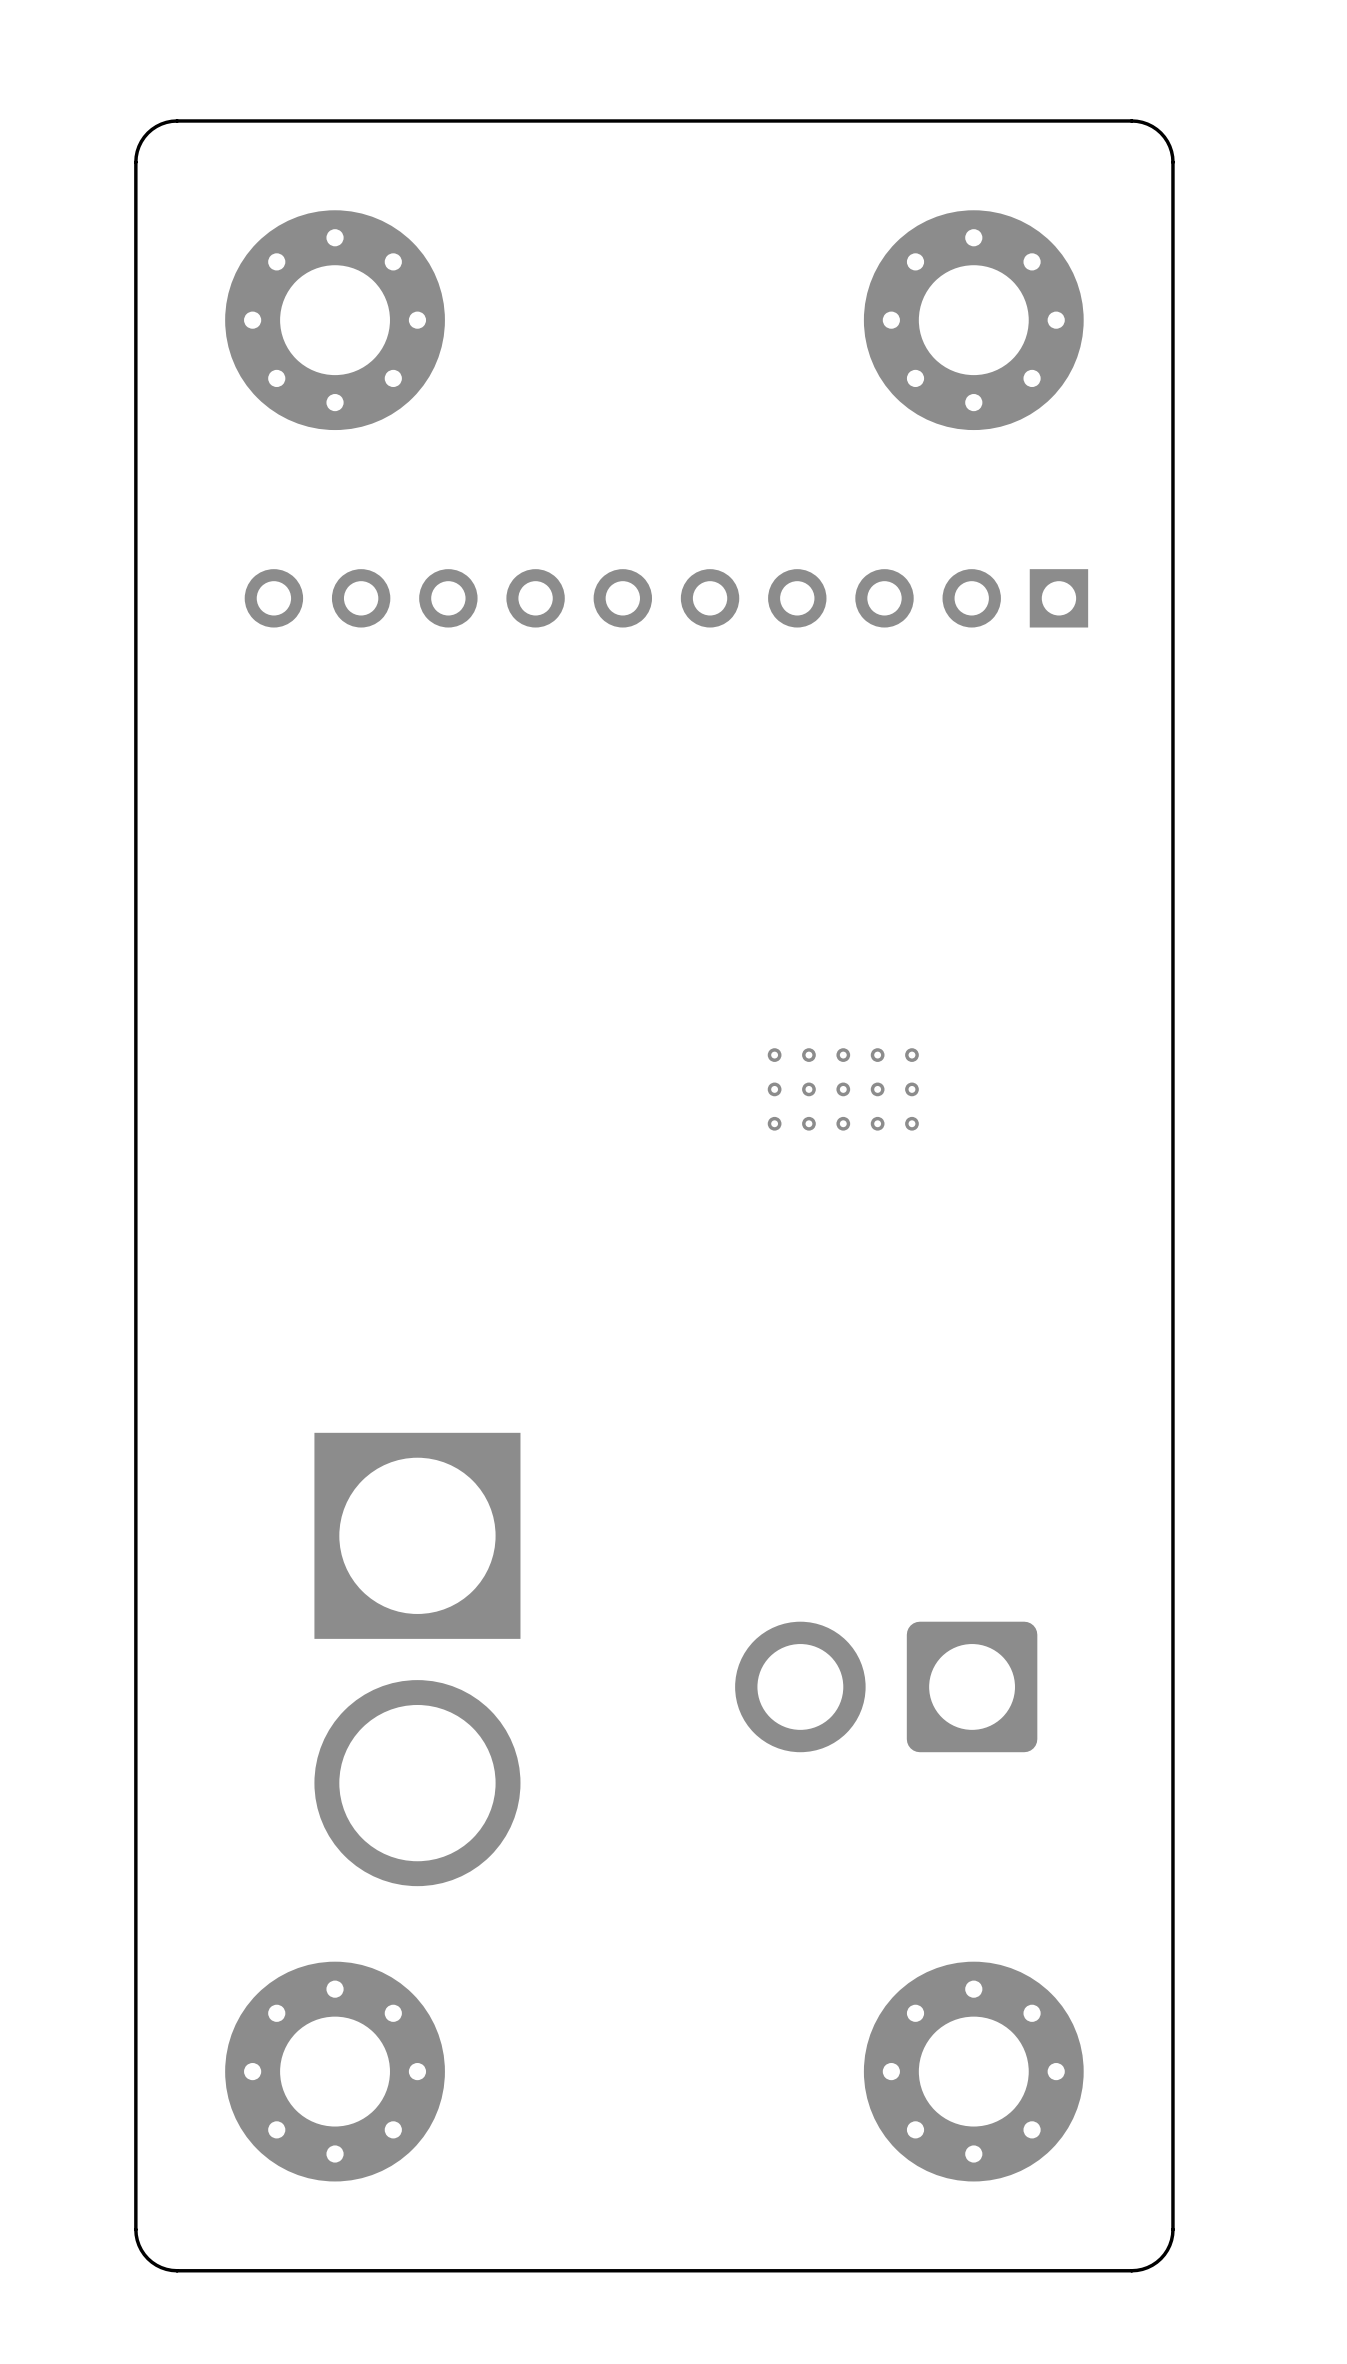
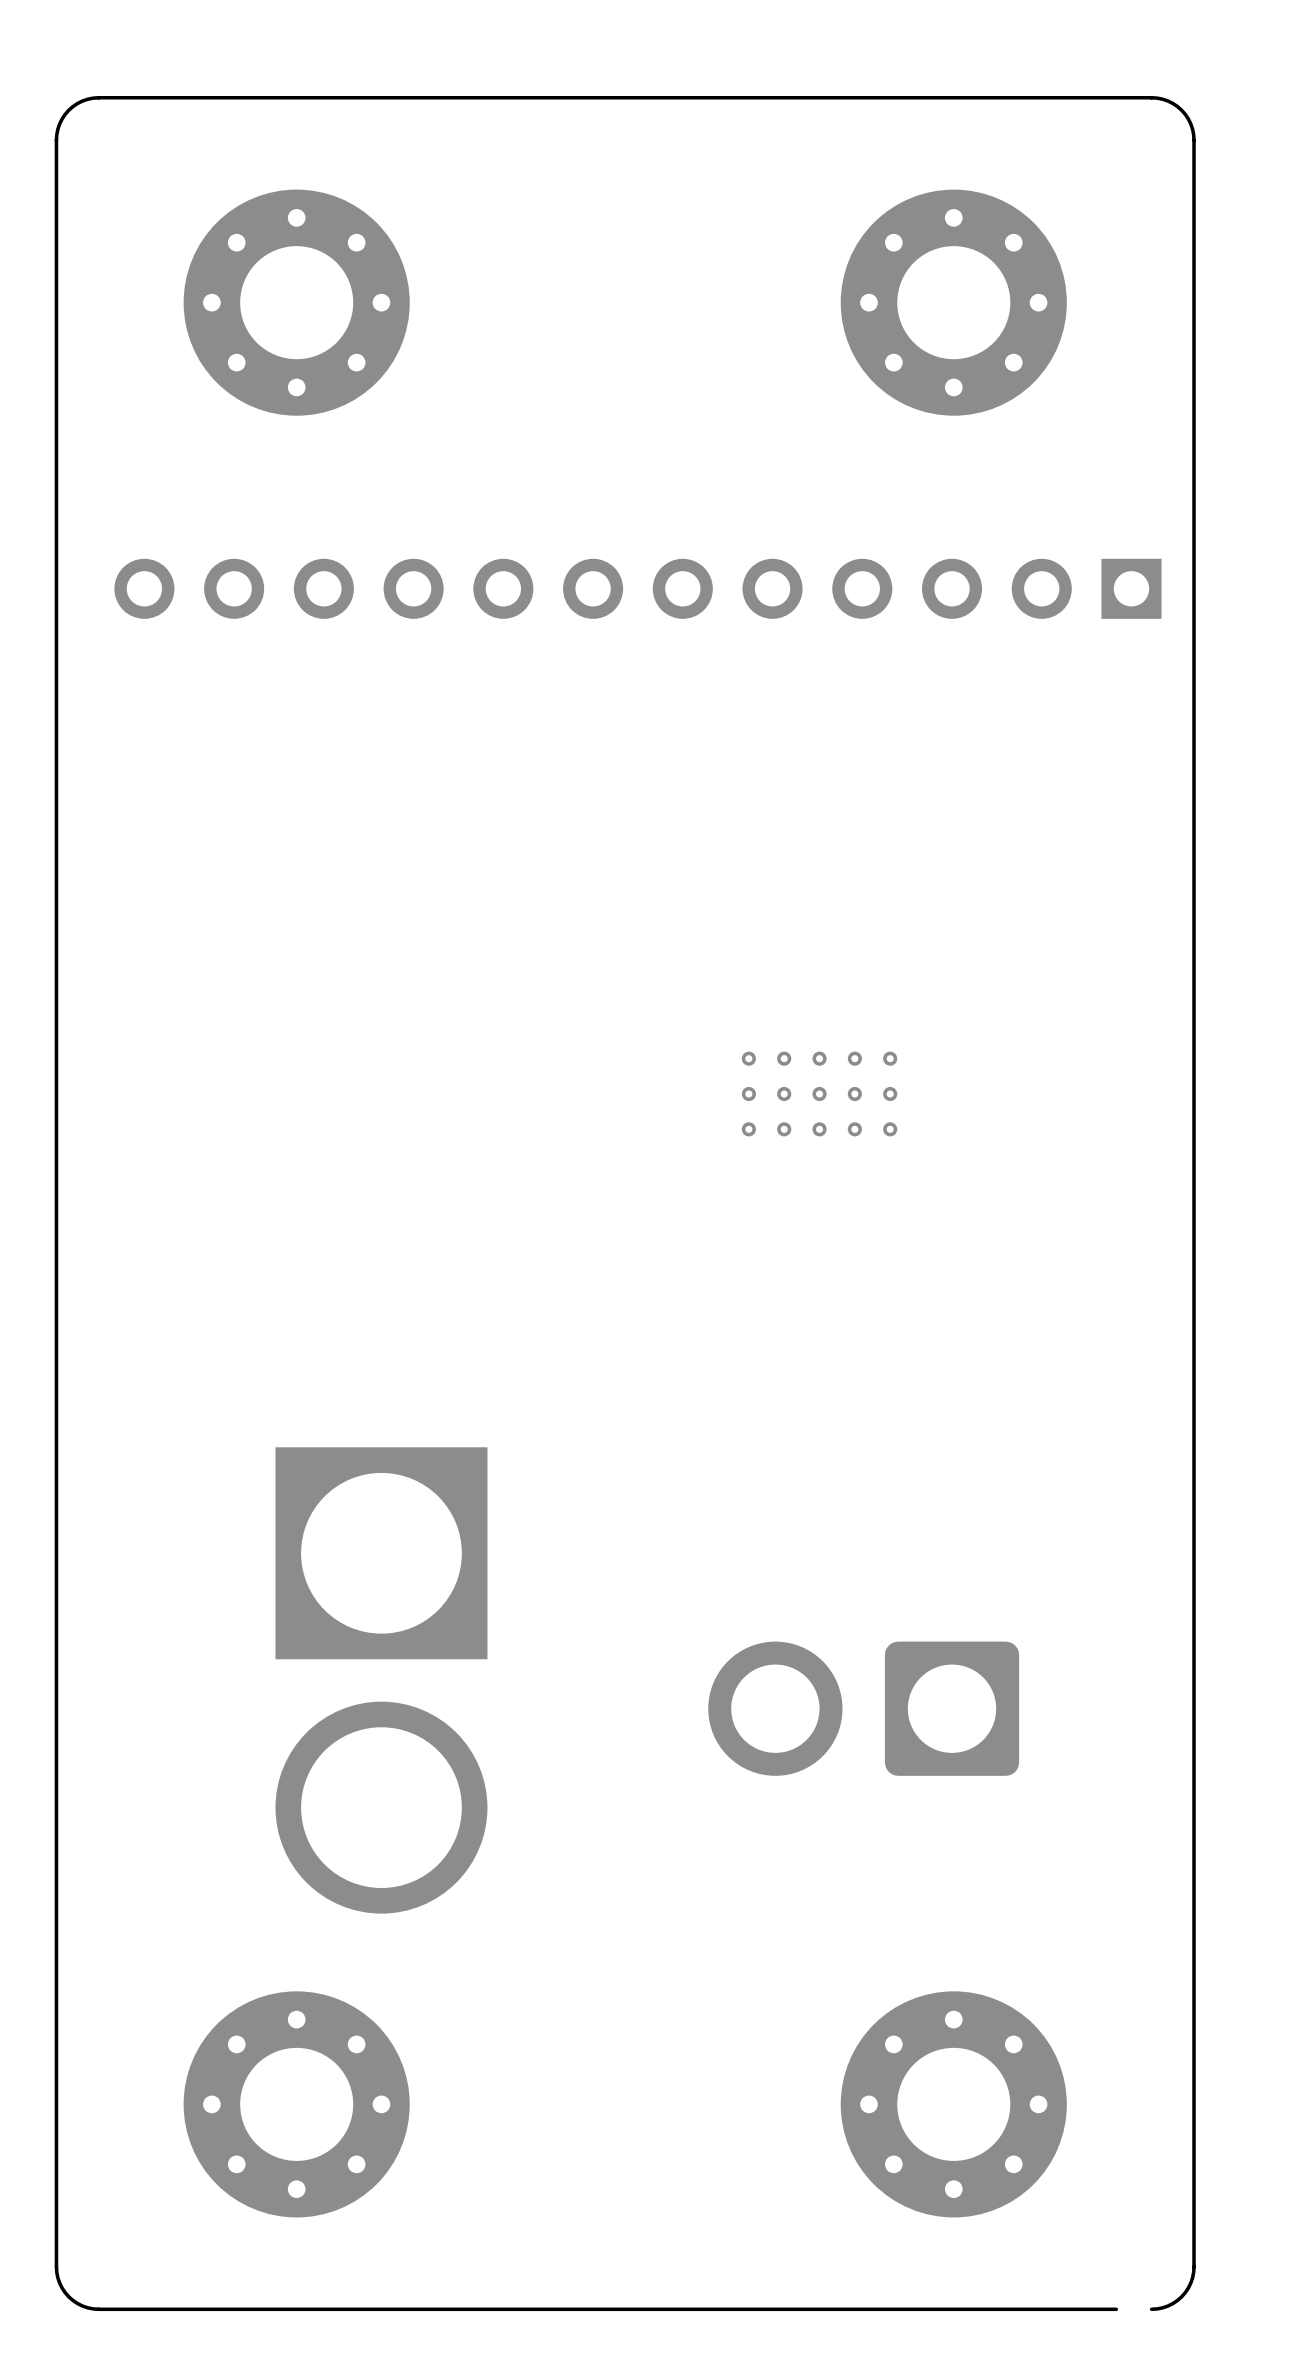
board edge: (177, 120) (161, 124) (147, 133) (138, 146) (135, 162) (135, 2229) (138, 2245) (147, 2258) (161, 2267) (177, 2270) -> (134, 97) (93, 98) (77, 103) (62, 118) (56, 140) (56, 2266) (62, 2288) (77, 2303) (93, 2308) (134, 2309)
board edge: (1131, 120) (1147, 124) (1160, 133) (1169, 146) (1172, 162) (1172, 2229) (1169, 2245) (1160, 2258) (1147, 2267) (1131, 2270) -> (1116, 97) (1157, 98) (1172, 103) (1188, 118) (1194, 140) (1194, 2266) (1190, 2283) (1181, 2296) (1167, 2306) (1151, 2309)
part footprint: [244, 569, 1089, 628] -> [114, 558, 1162, 619]

